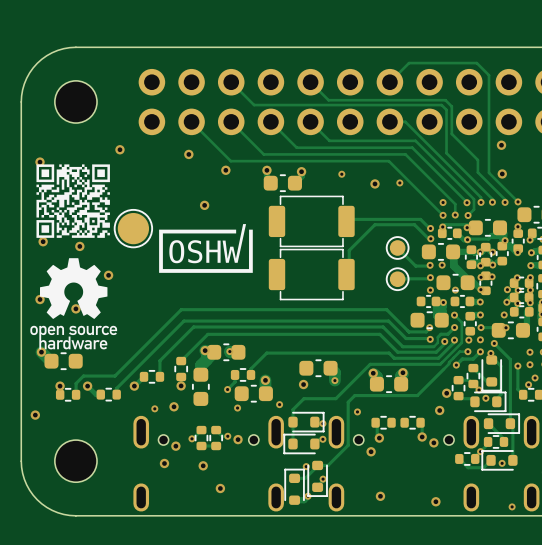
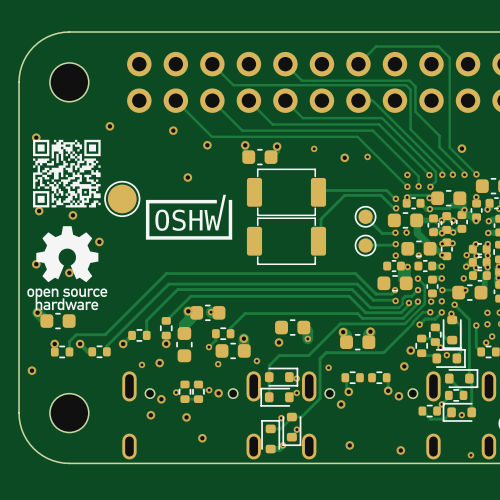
via: (501, 145) -> none

